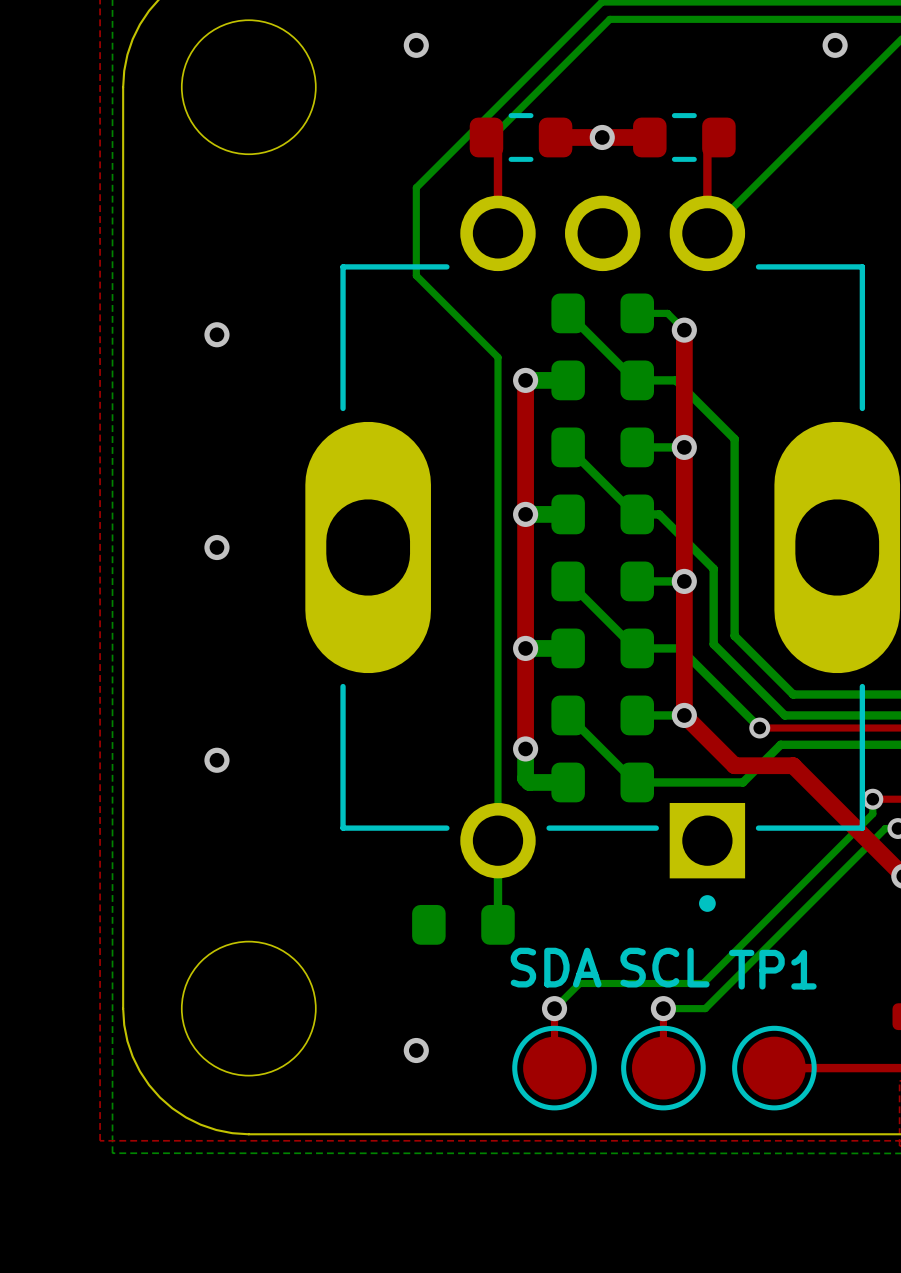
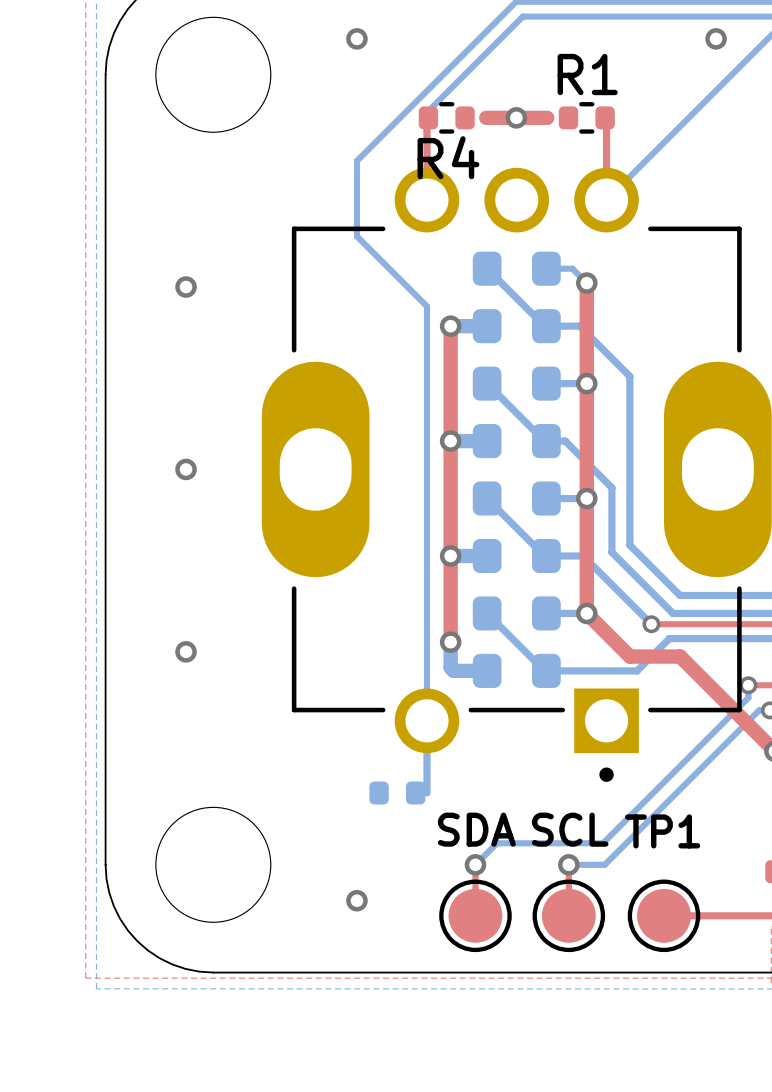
part: (521, 137) -> none
R4: none -> (446, 117)
part: (684, 137) -> none
R1: none -> (586, 117)
part footprint: [412, 904, 515, 945] -> [369, 781, 426, 805]

